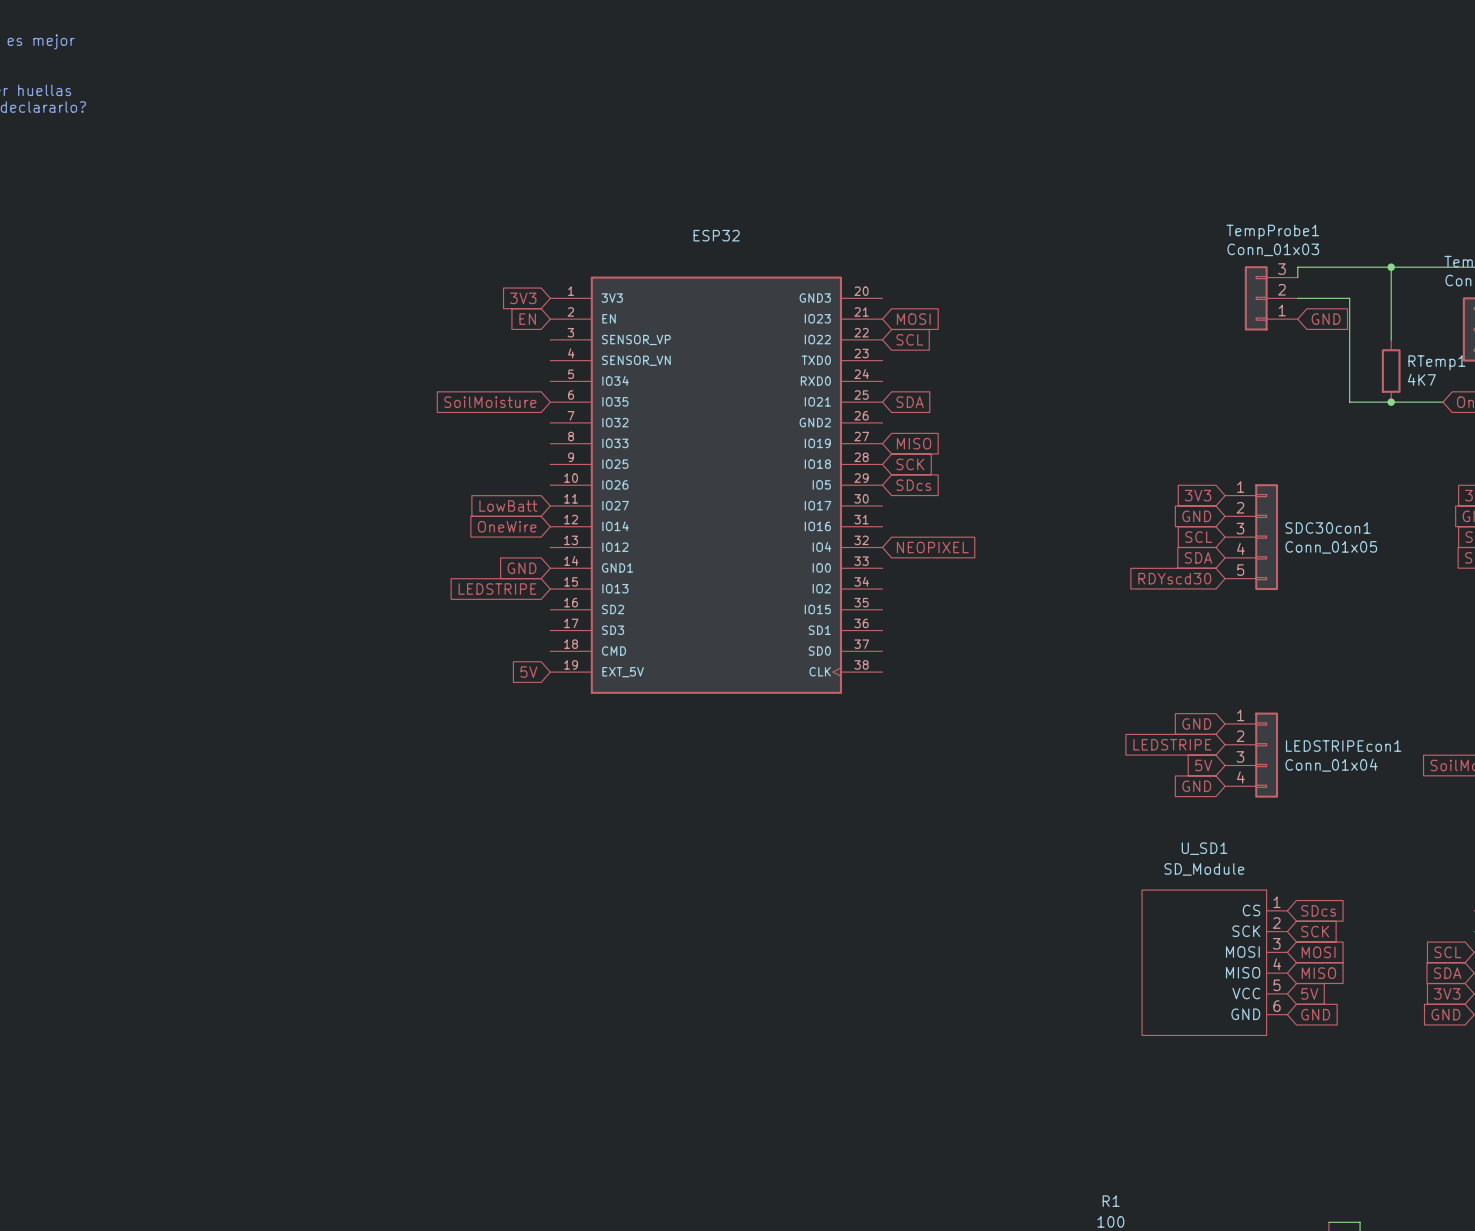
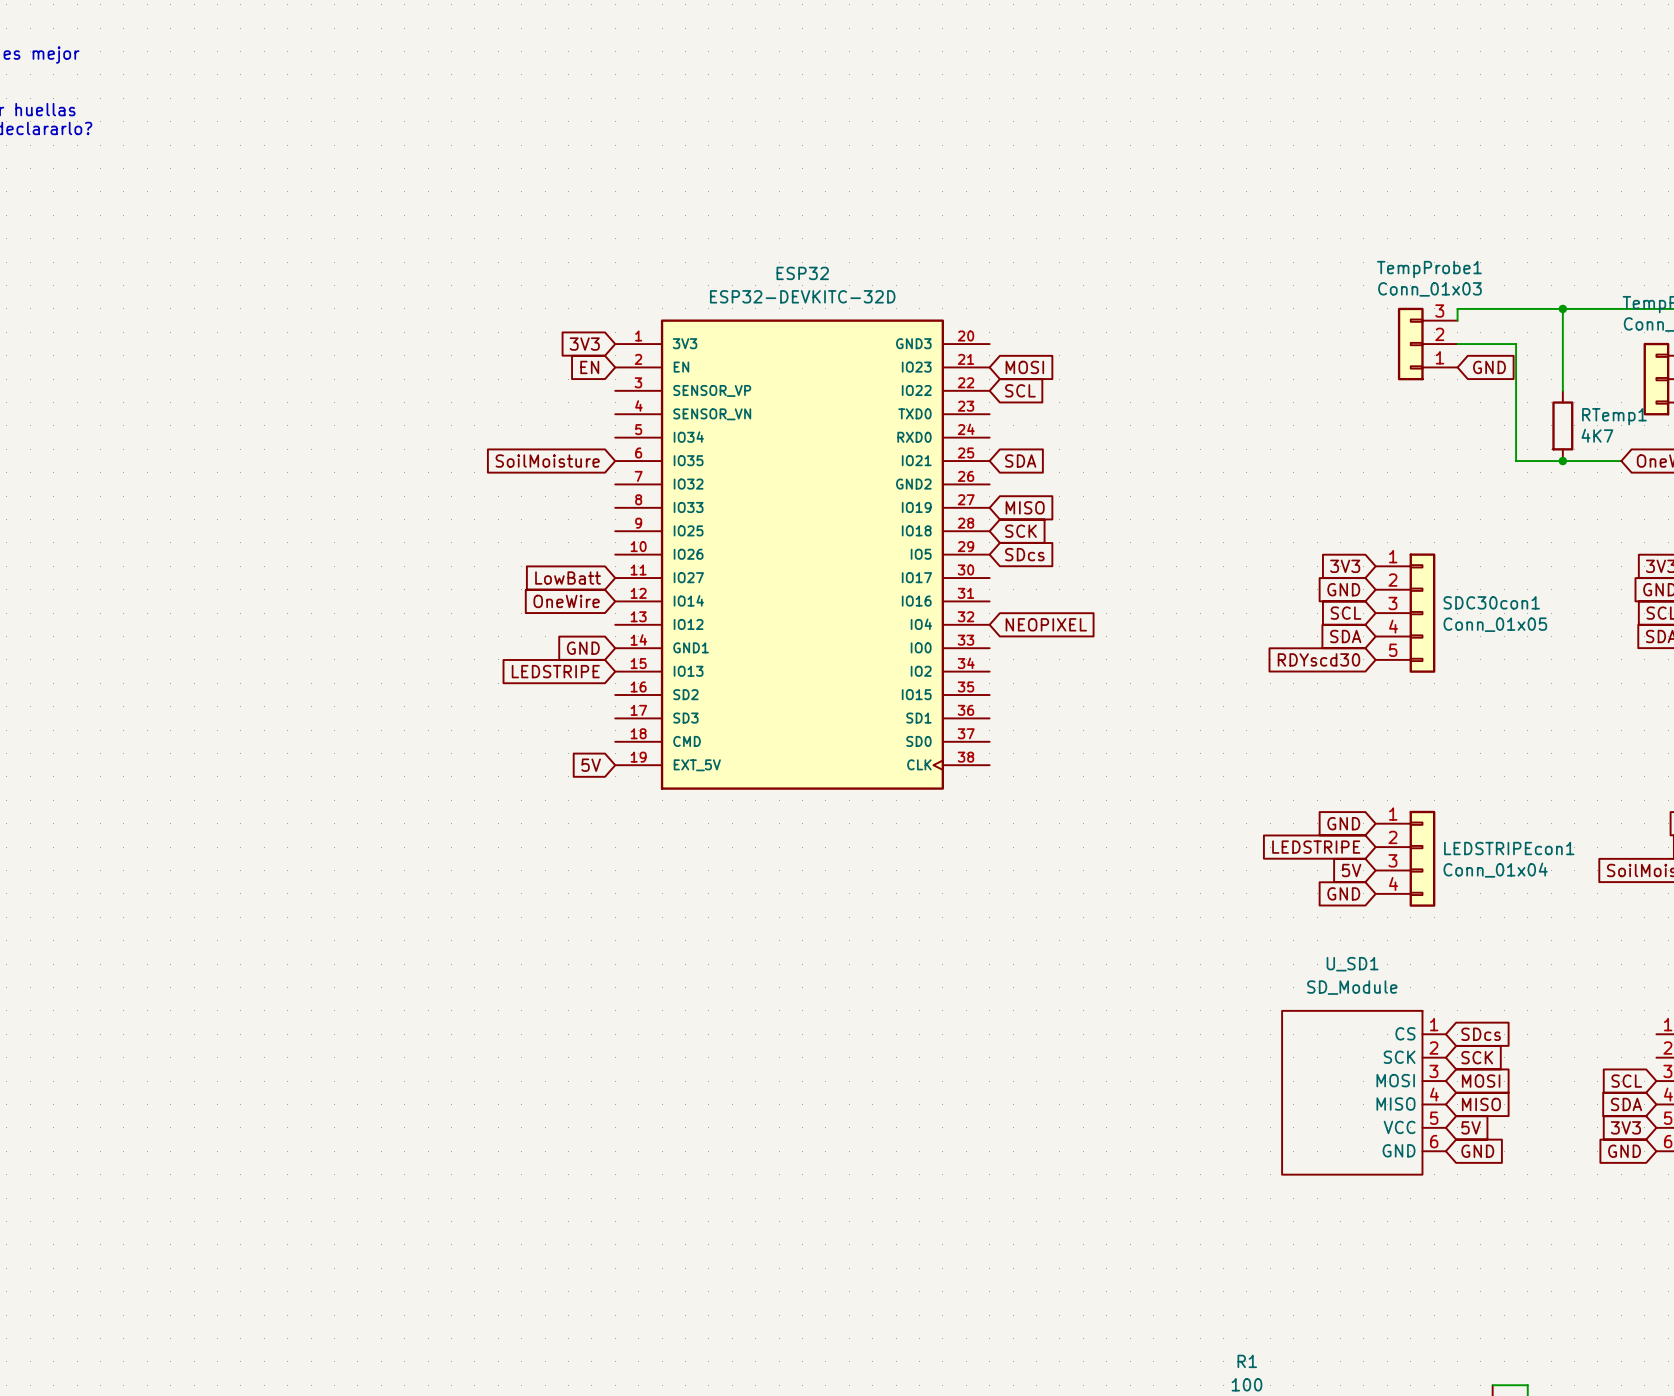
ESP32 value: none -> ESP32-DEVKITC-32D (802, 296)

